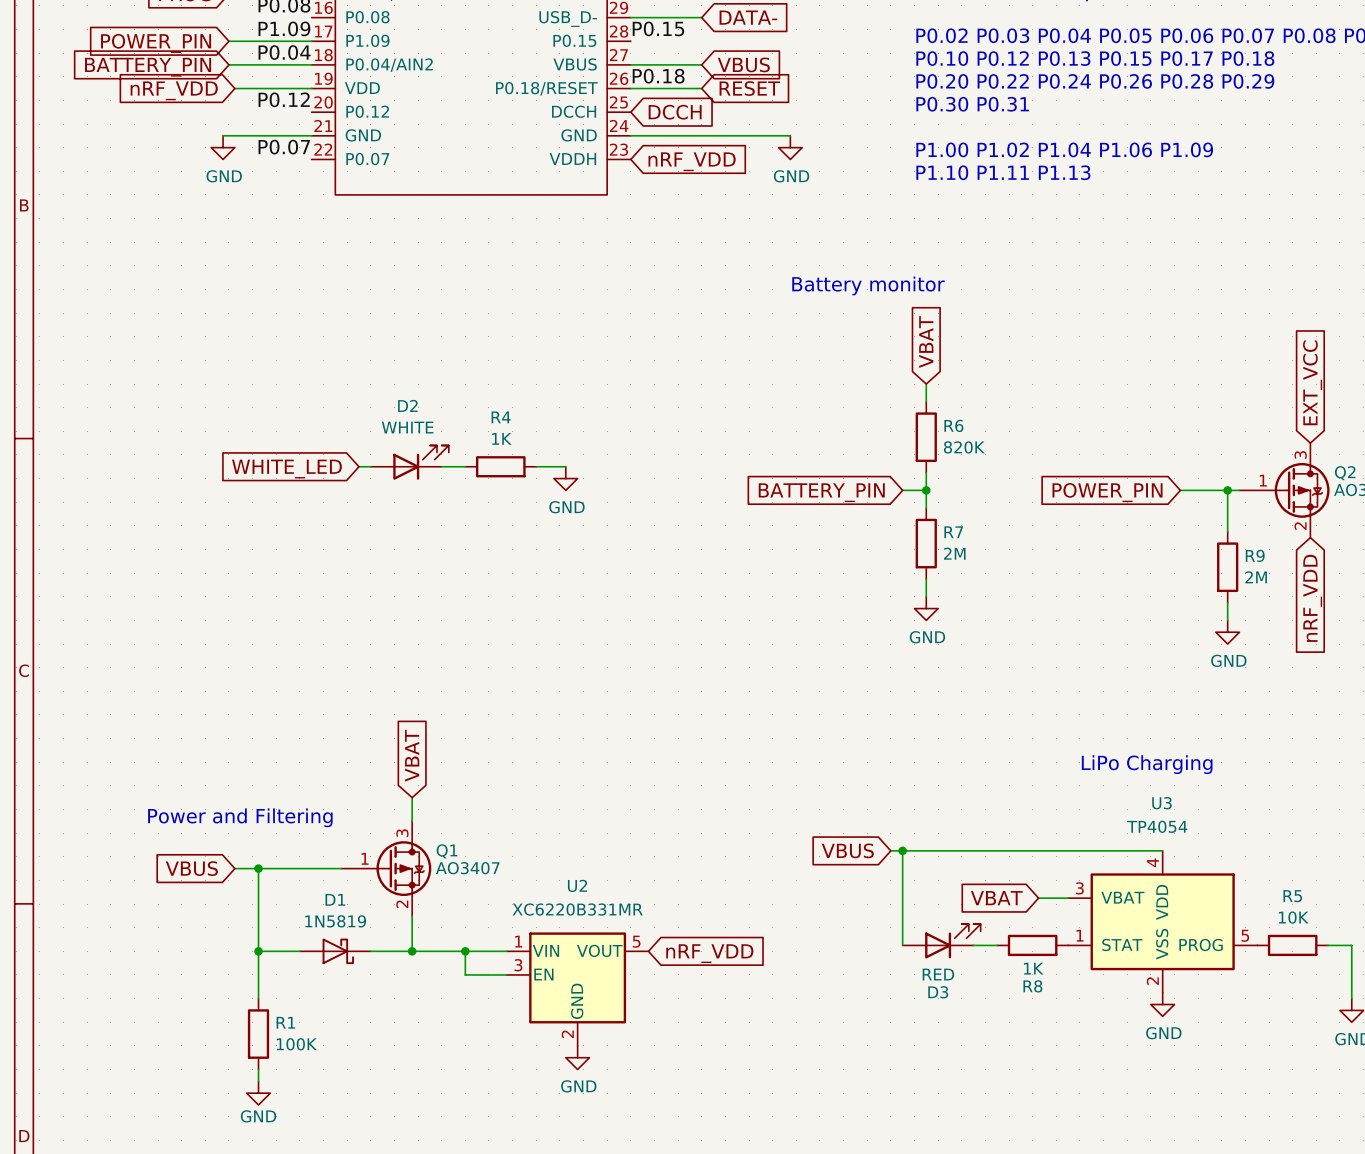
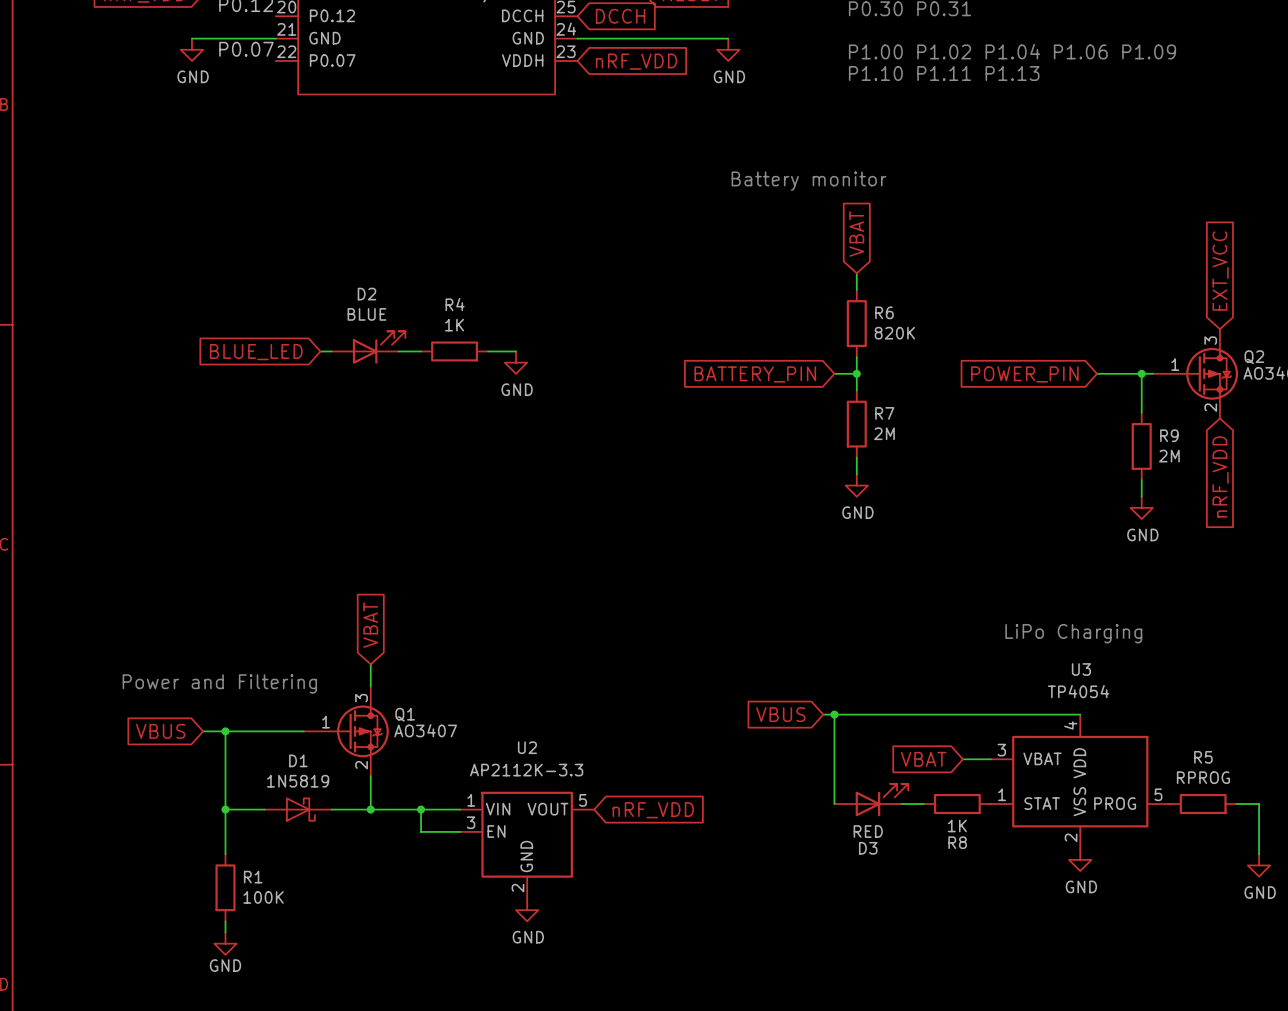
D2 value: WHITE (407, 427) -> BLUE (366, 314)
global label: WHITE_LED (286, 469) -> BLUE_LED (256, 352)
U2 value: XC6220B331MR (577, 909) -> AP2112K-3.3 (526, 770)
R5 value: 10K (1293, 917) -> RPROG (1203, 777)

